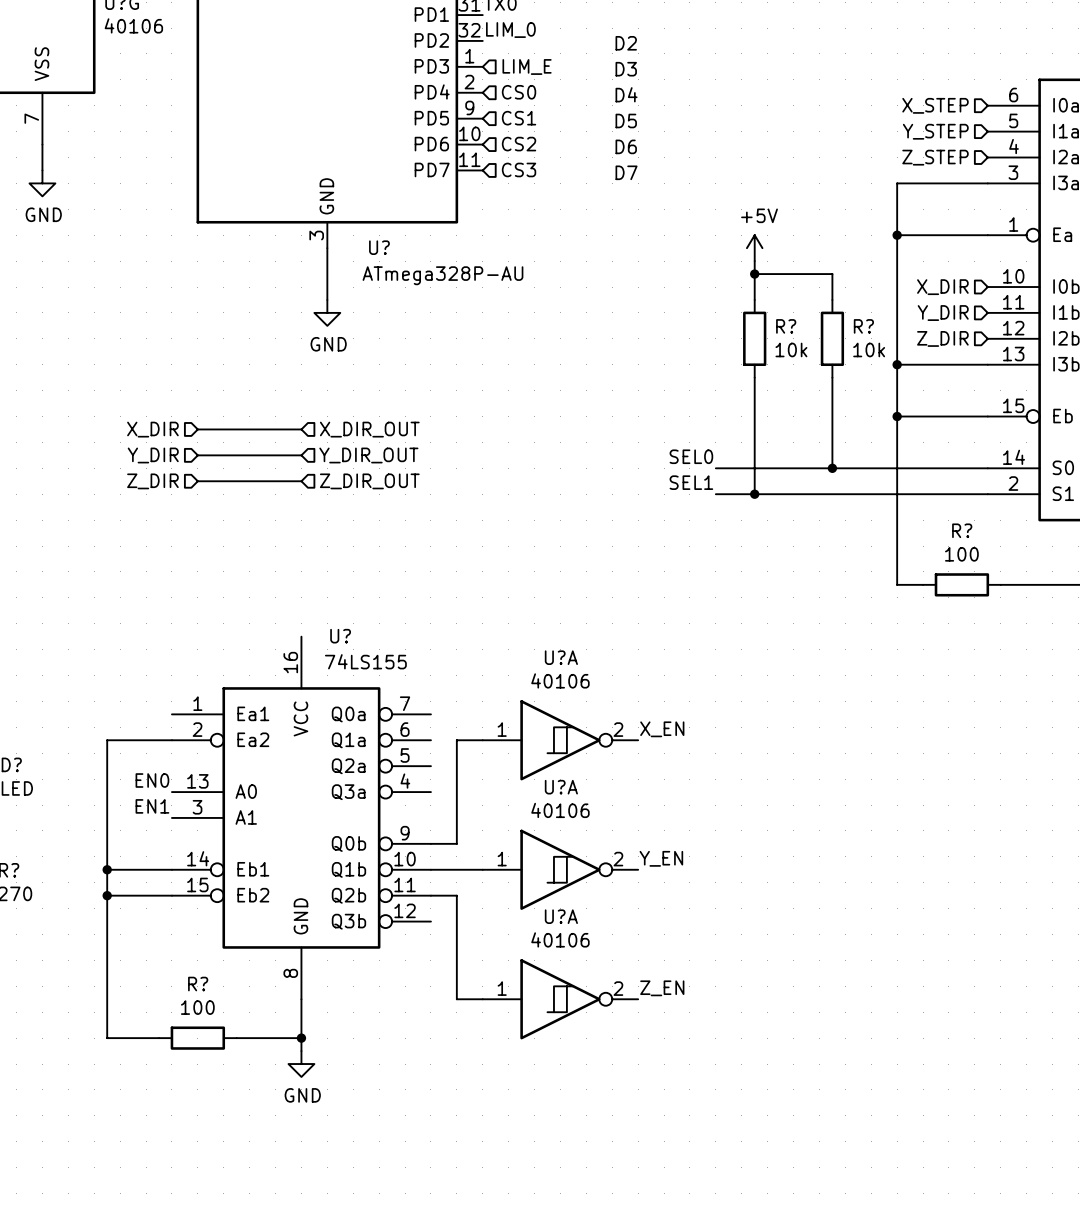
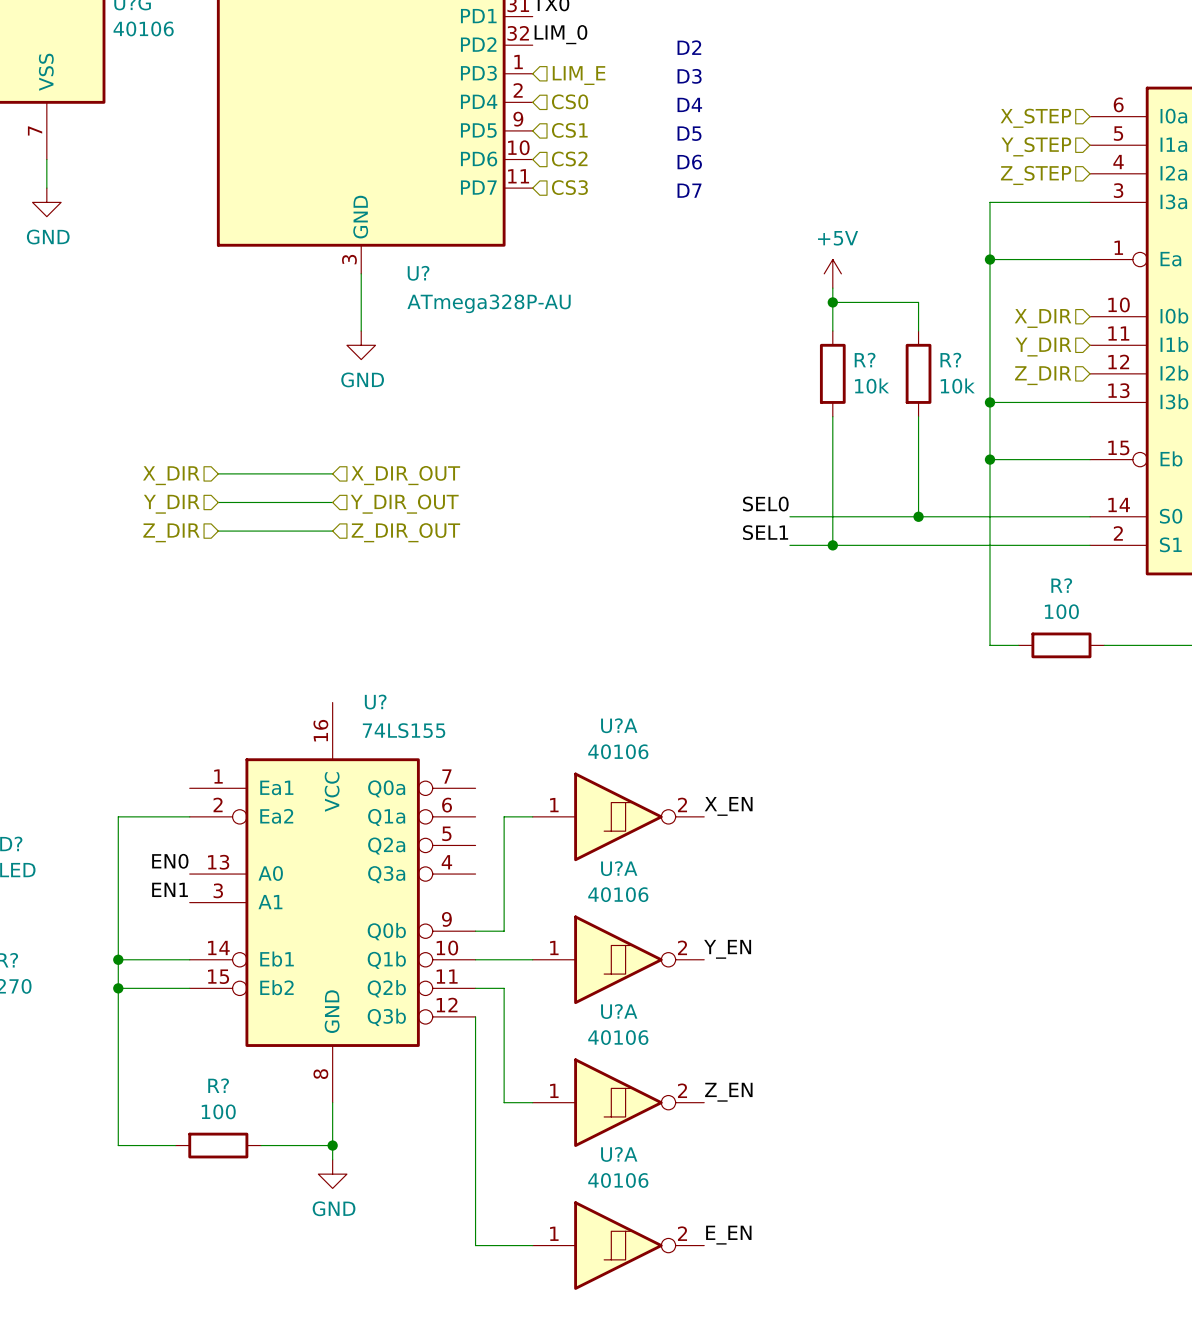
wire: none -> (475, 1016) (475, 1245) (532, 1245)
label: none -> E_EN (728, 1235)
U?A: none -> 40106 (618, 1245)

